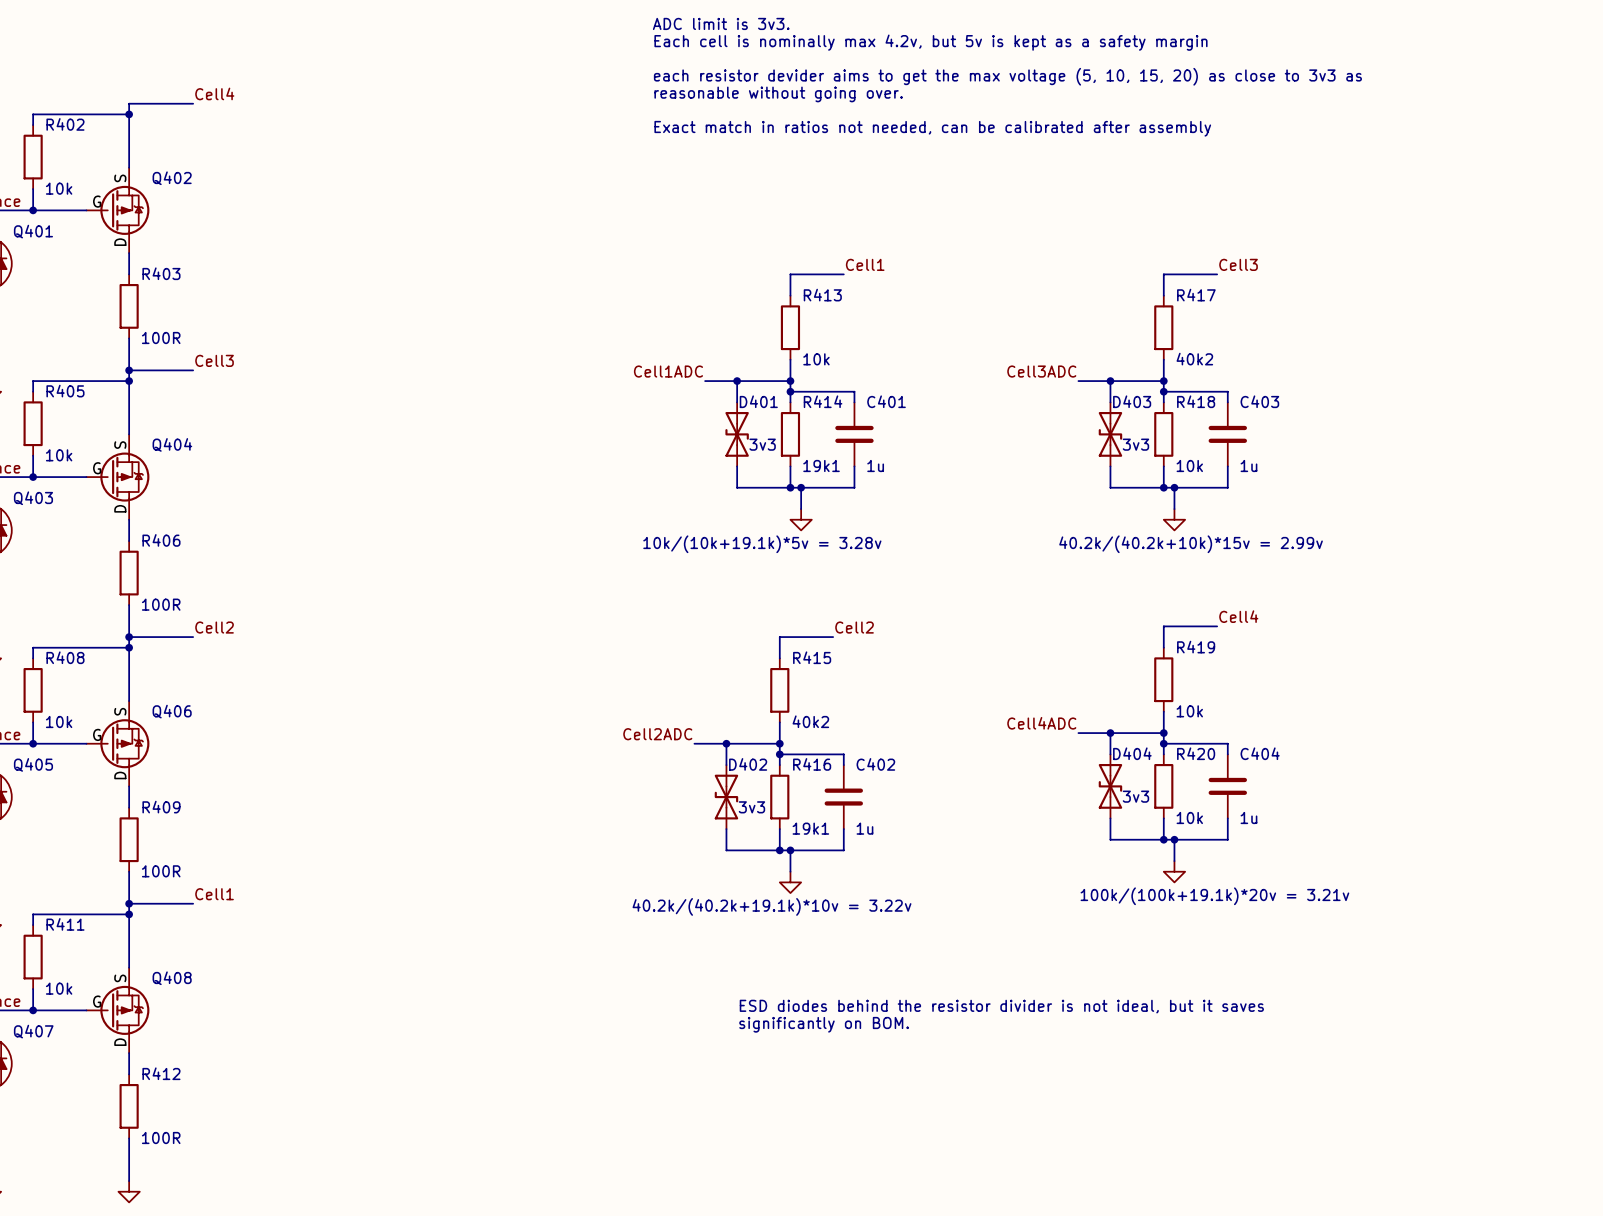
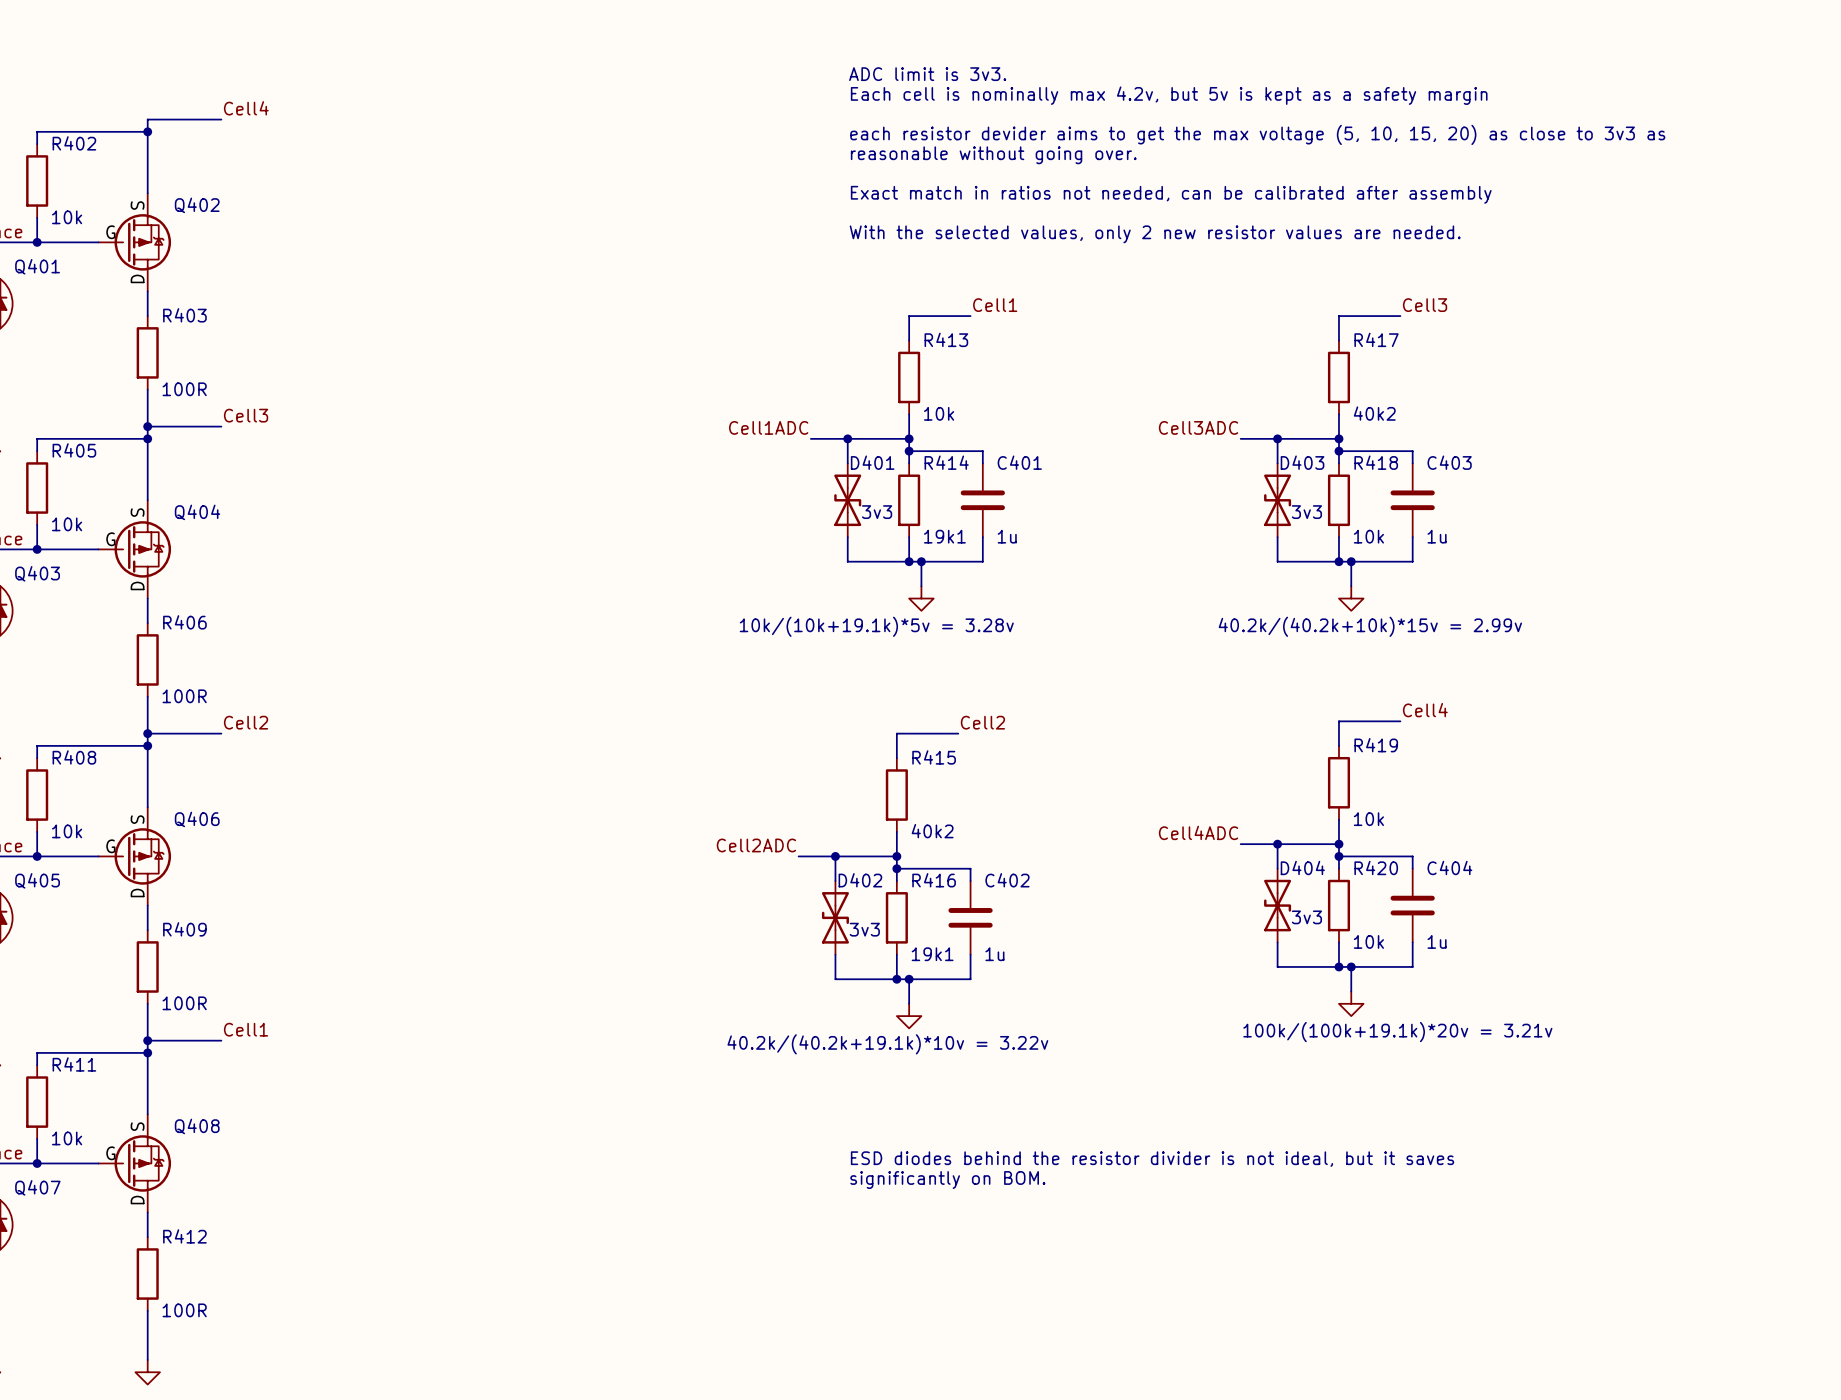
text position: ADC limit is 3v3. (721, 23) -> ADC limit is 3v3. (927, 74)
text position: Each cell is nominally max 4.2v, but 5v is kept as a safety margin (930, 42) -> Each cell is nominally max 4.2v, but 5v is kept as a safety margin (1169, 95)
text position: each resistor devider aims to get the max voltage (5, 10, 15, 20) as close to 3v3 as (1007, 76) -> each resistor devider aims to get the max voltage (5, 10, 15, 20) as close to 3v3 as (1257, 134)
text position: reasonable without going over. (778, 94) -> reasonable without going over. (993, 155)
text position: Exact match in ratios not needed, can be calibrated after assembly (932, 128) -> Exact match in ratios not needed, can be calibrated after assembly (1171, 194)
text: none -> With the selected values, only 2 new resistor values are needed. (1155, 234)

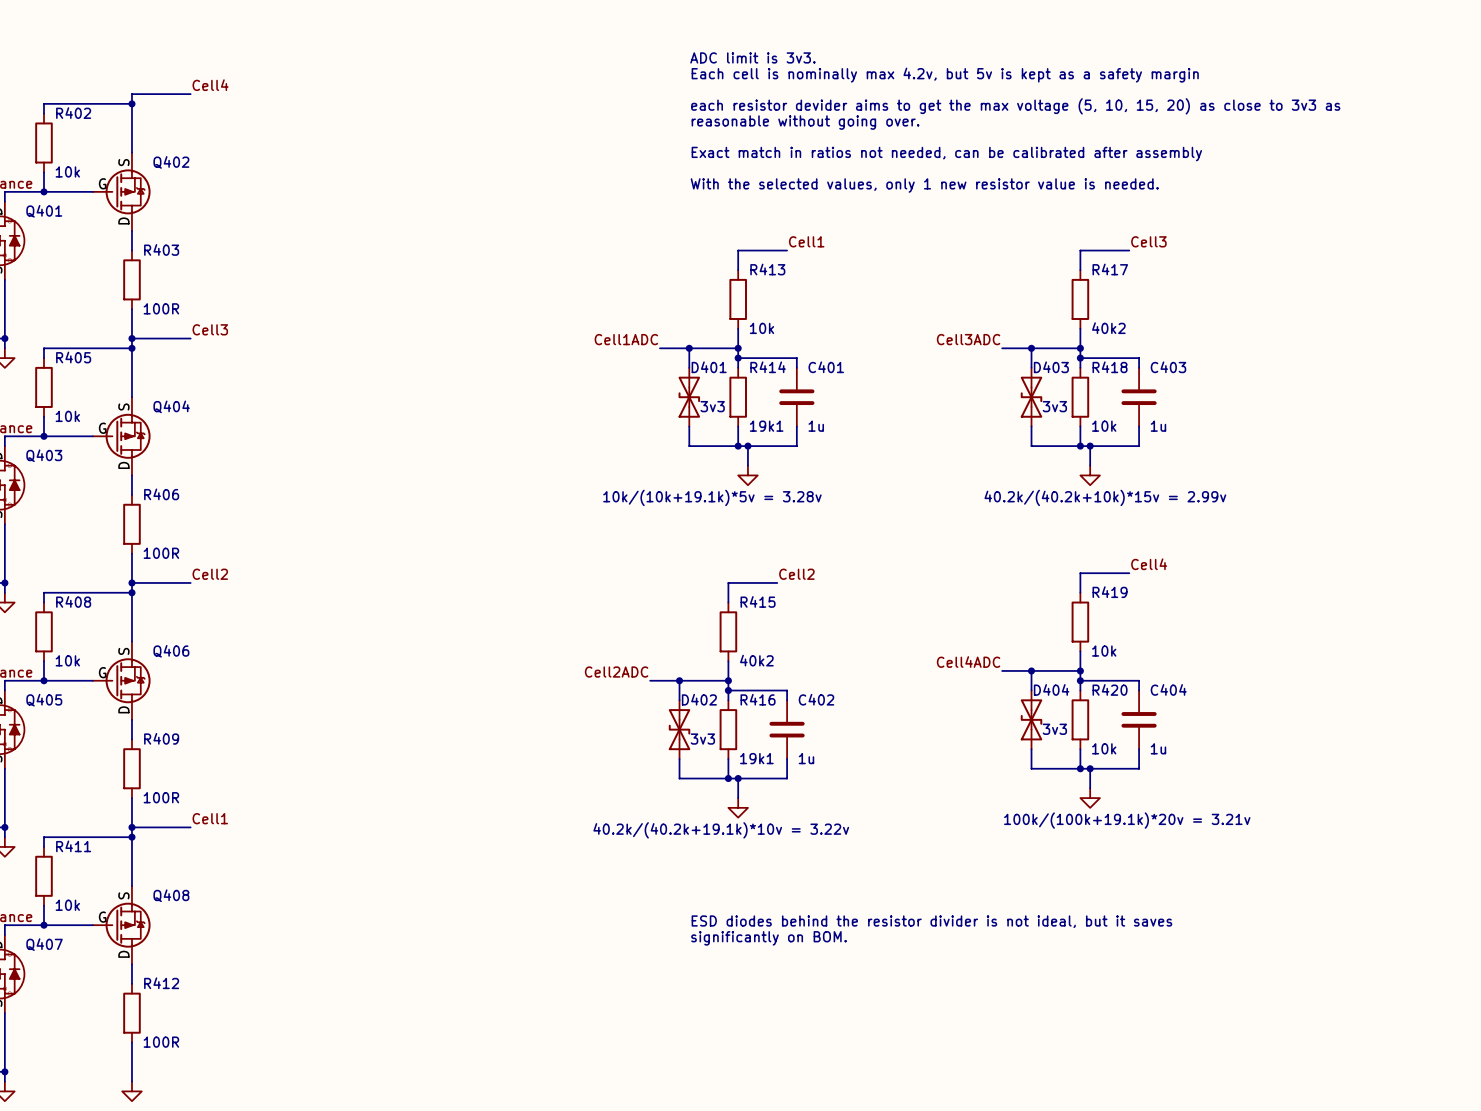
text: With the selected values, only 2 new resistor values are needed. (1155, 234) -> With the selected values, only 1 new resistor value is needed. (924, 185)

